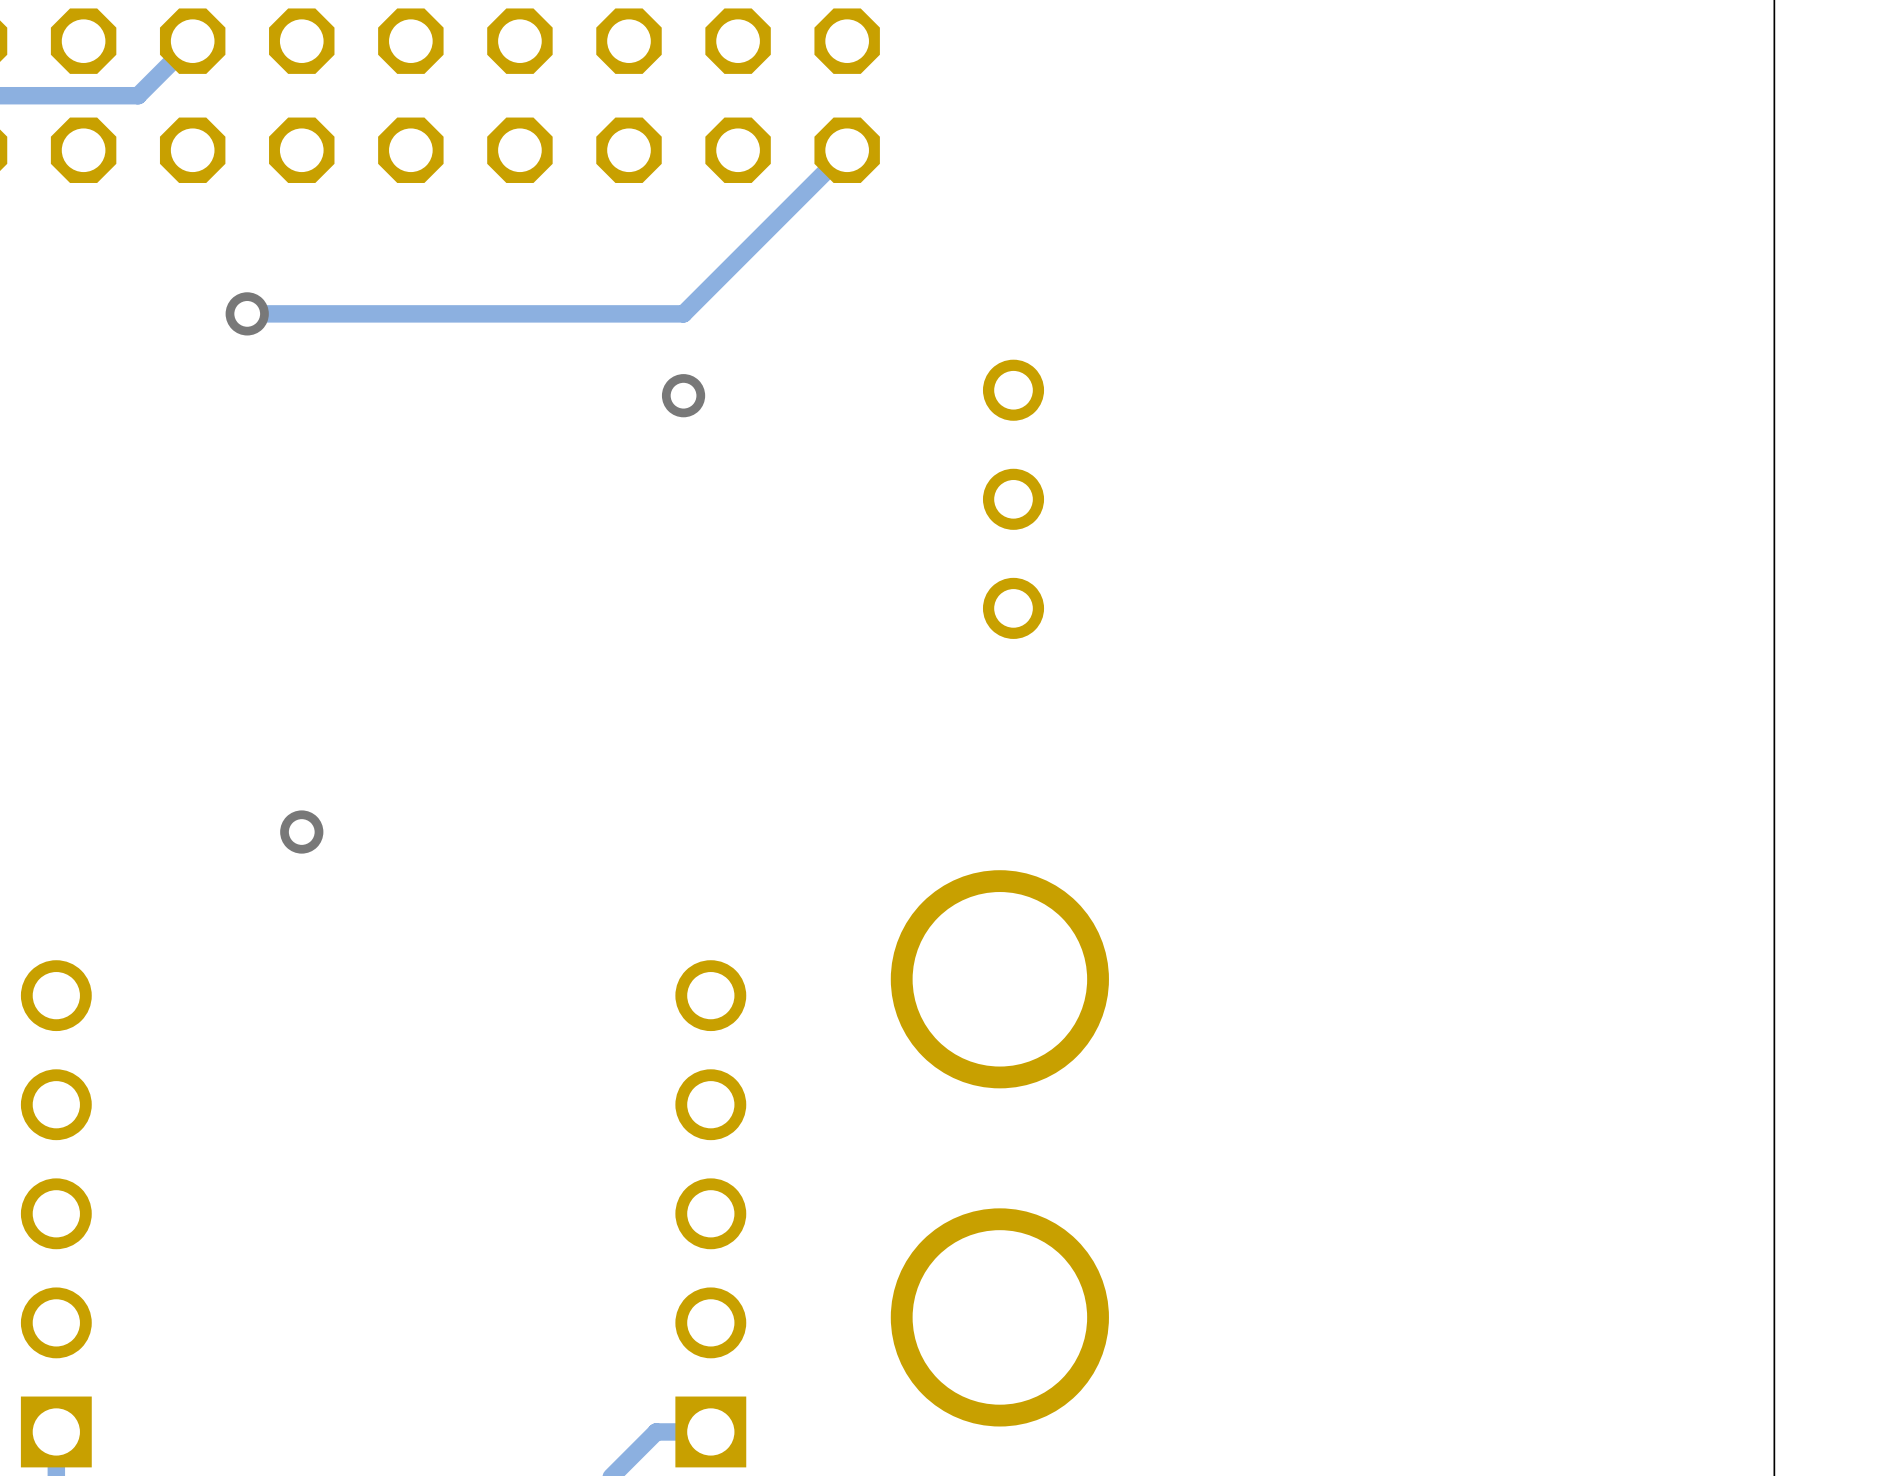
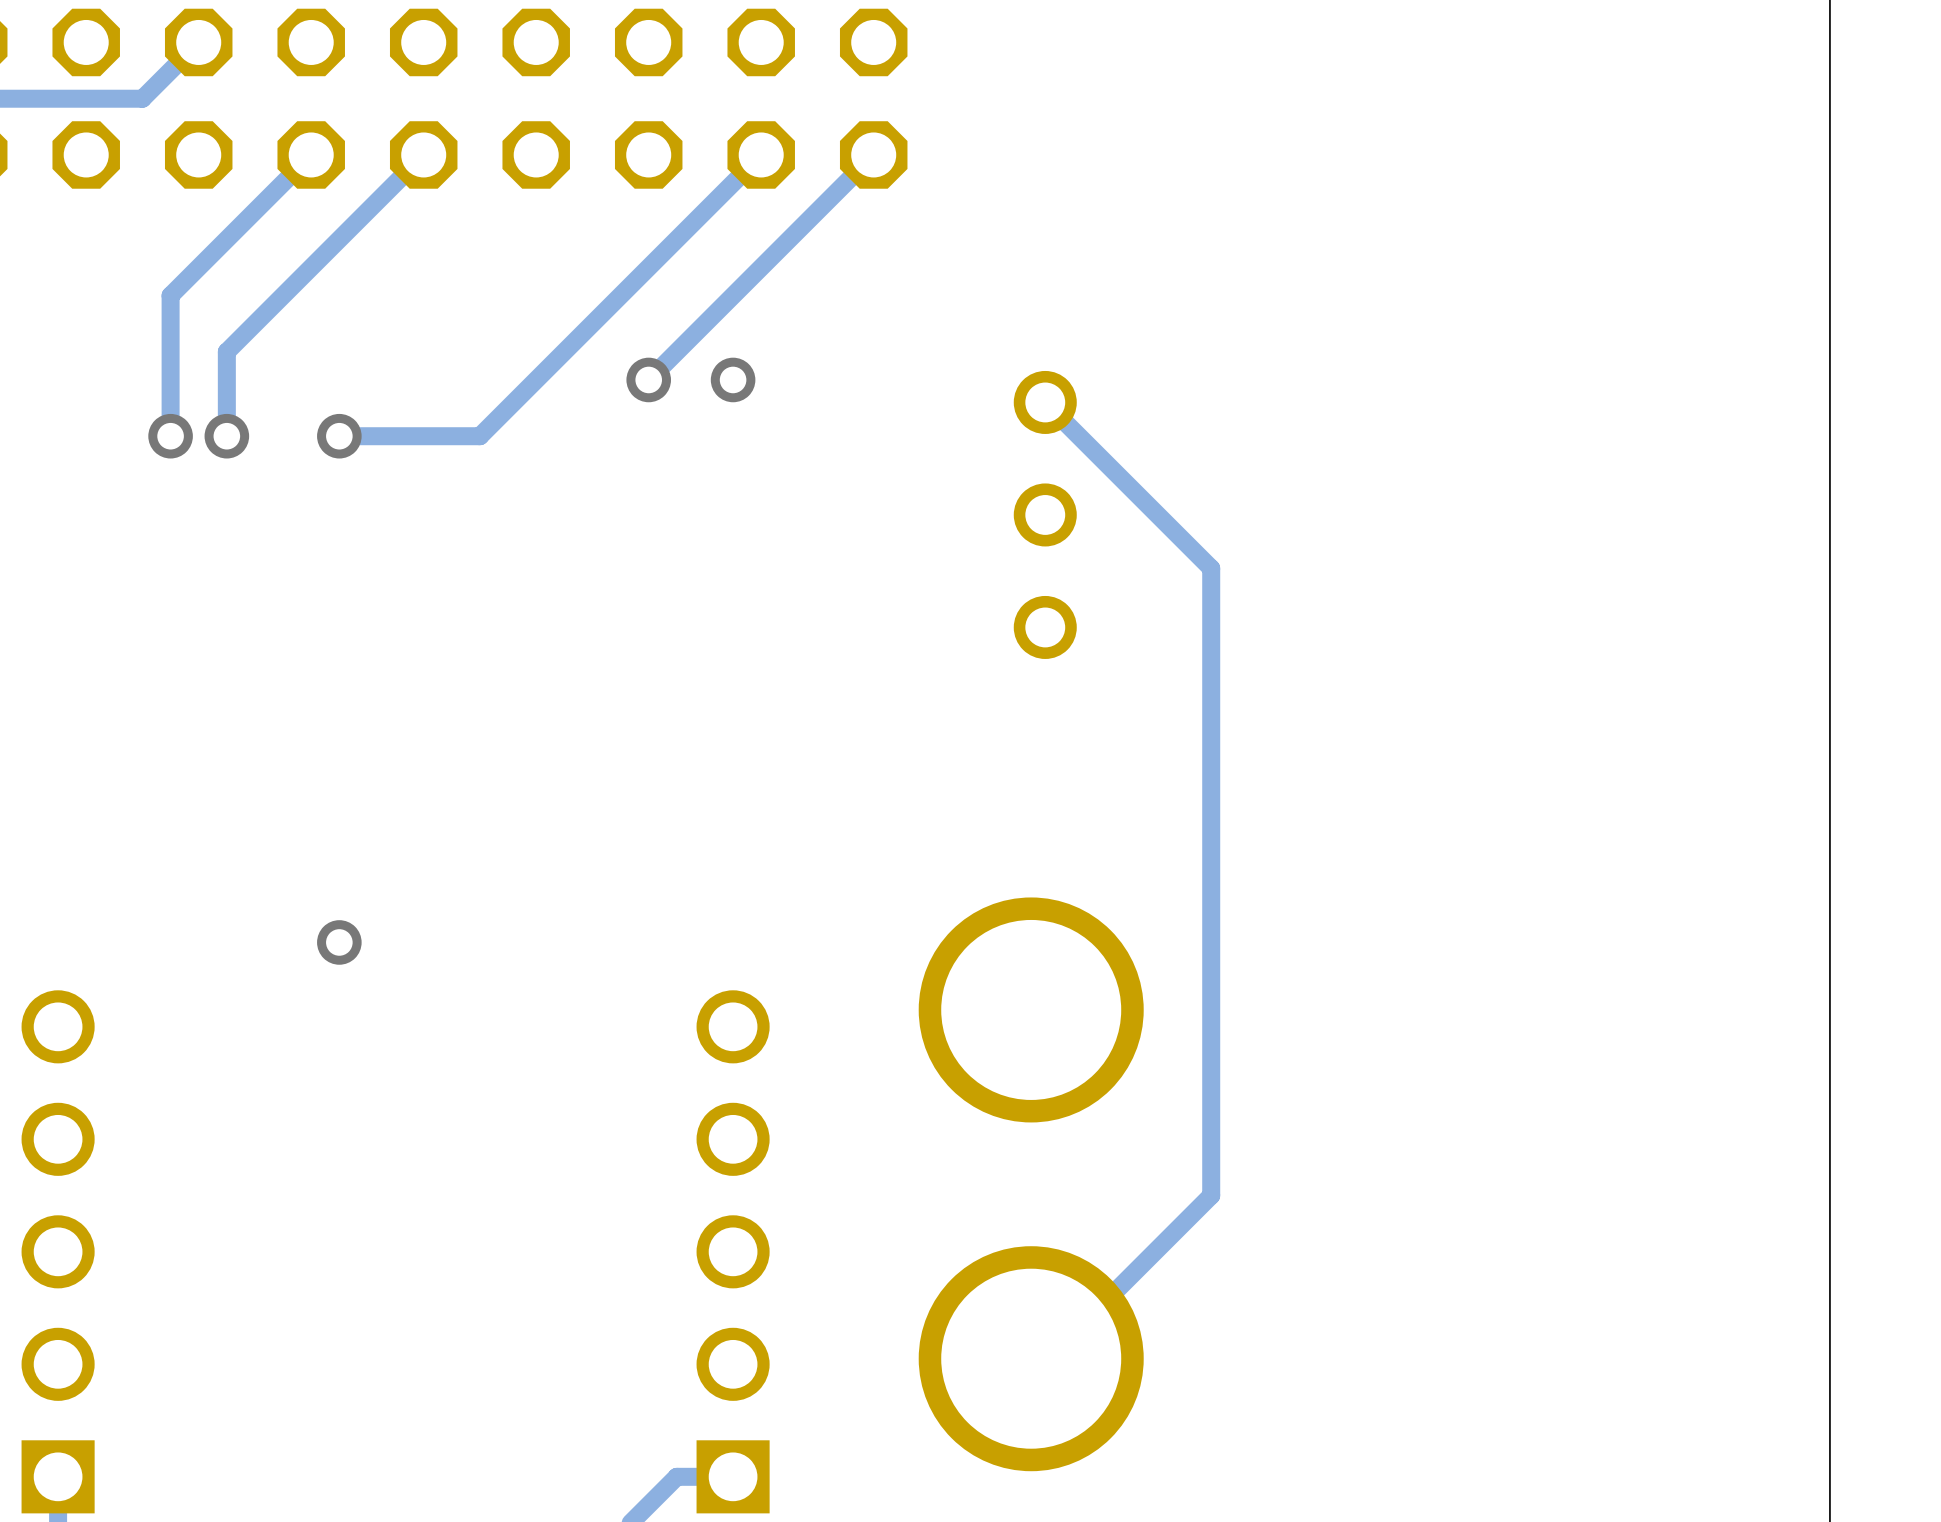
track: none -> (311, 154) (170, 295) (170, 436)
track: none -> (423, 154) (226, 351) (226, 436)
track: none -> (761, 154) (479, 436) (339, 436)
via: (247, 313) -> none
track: (683, 313) (247, 313) -> (704, 323) (648, 379)
via: none -> (648, 379)
track: none -> (1045, 402) (1211, 568) (1211, 1195) (1048, 1358) (1031, 1358)
via position: (683, 395) -> (733, 379)
via: none -> (170, 436)
via: none -> (226, 436)
via: none -> (339, 436)
via position: (301, 832) -> (339, 942)

